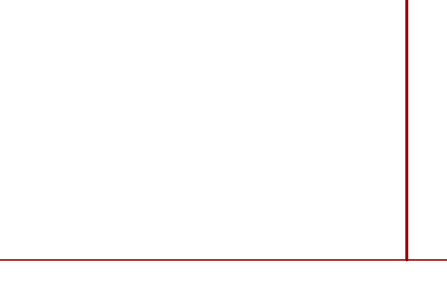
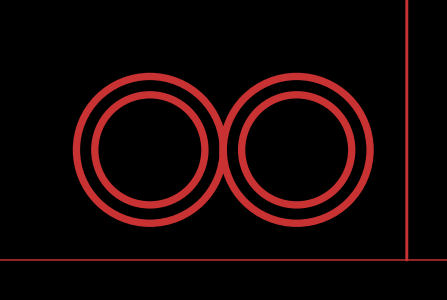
part: none -> (149, 149)
part: none -> (296, 149)

